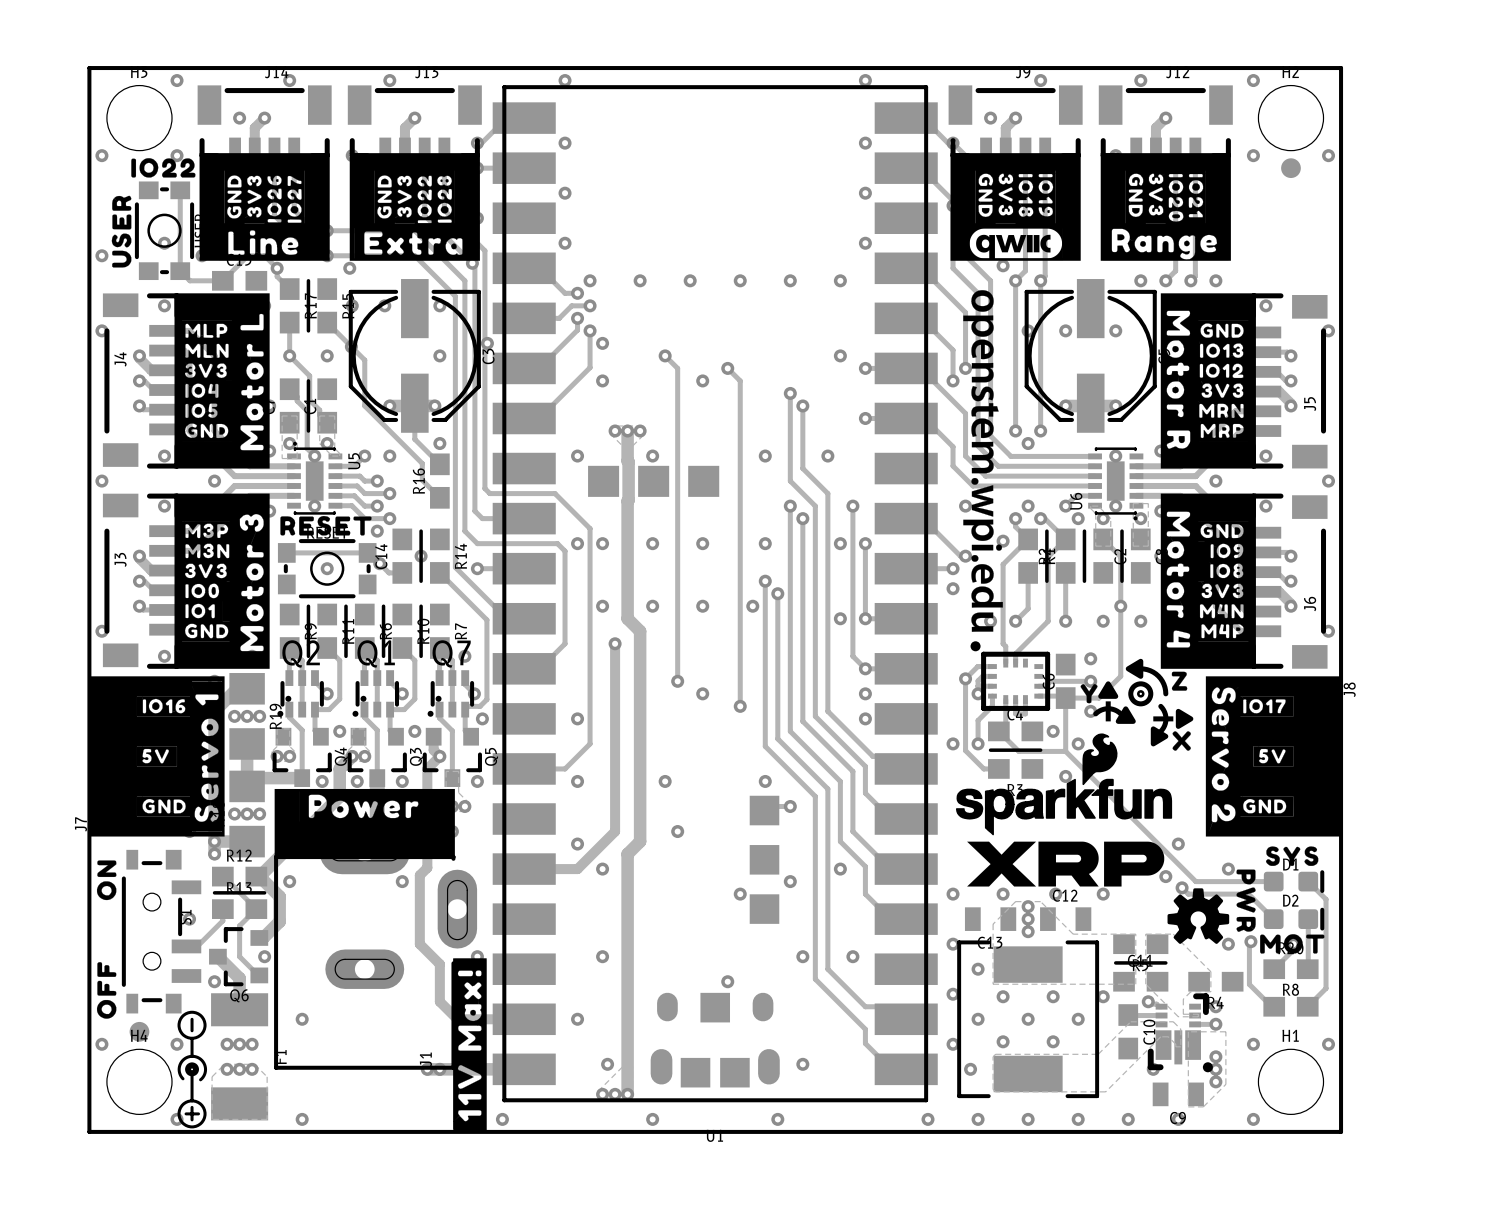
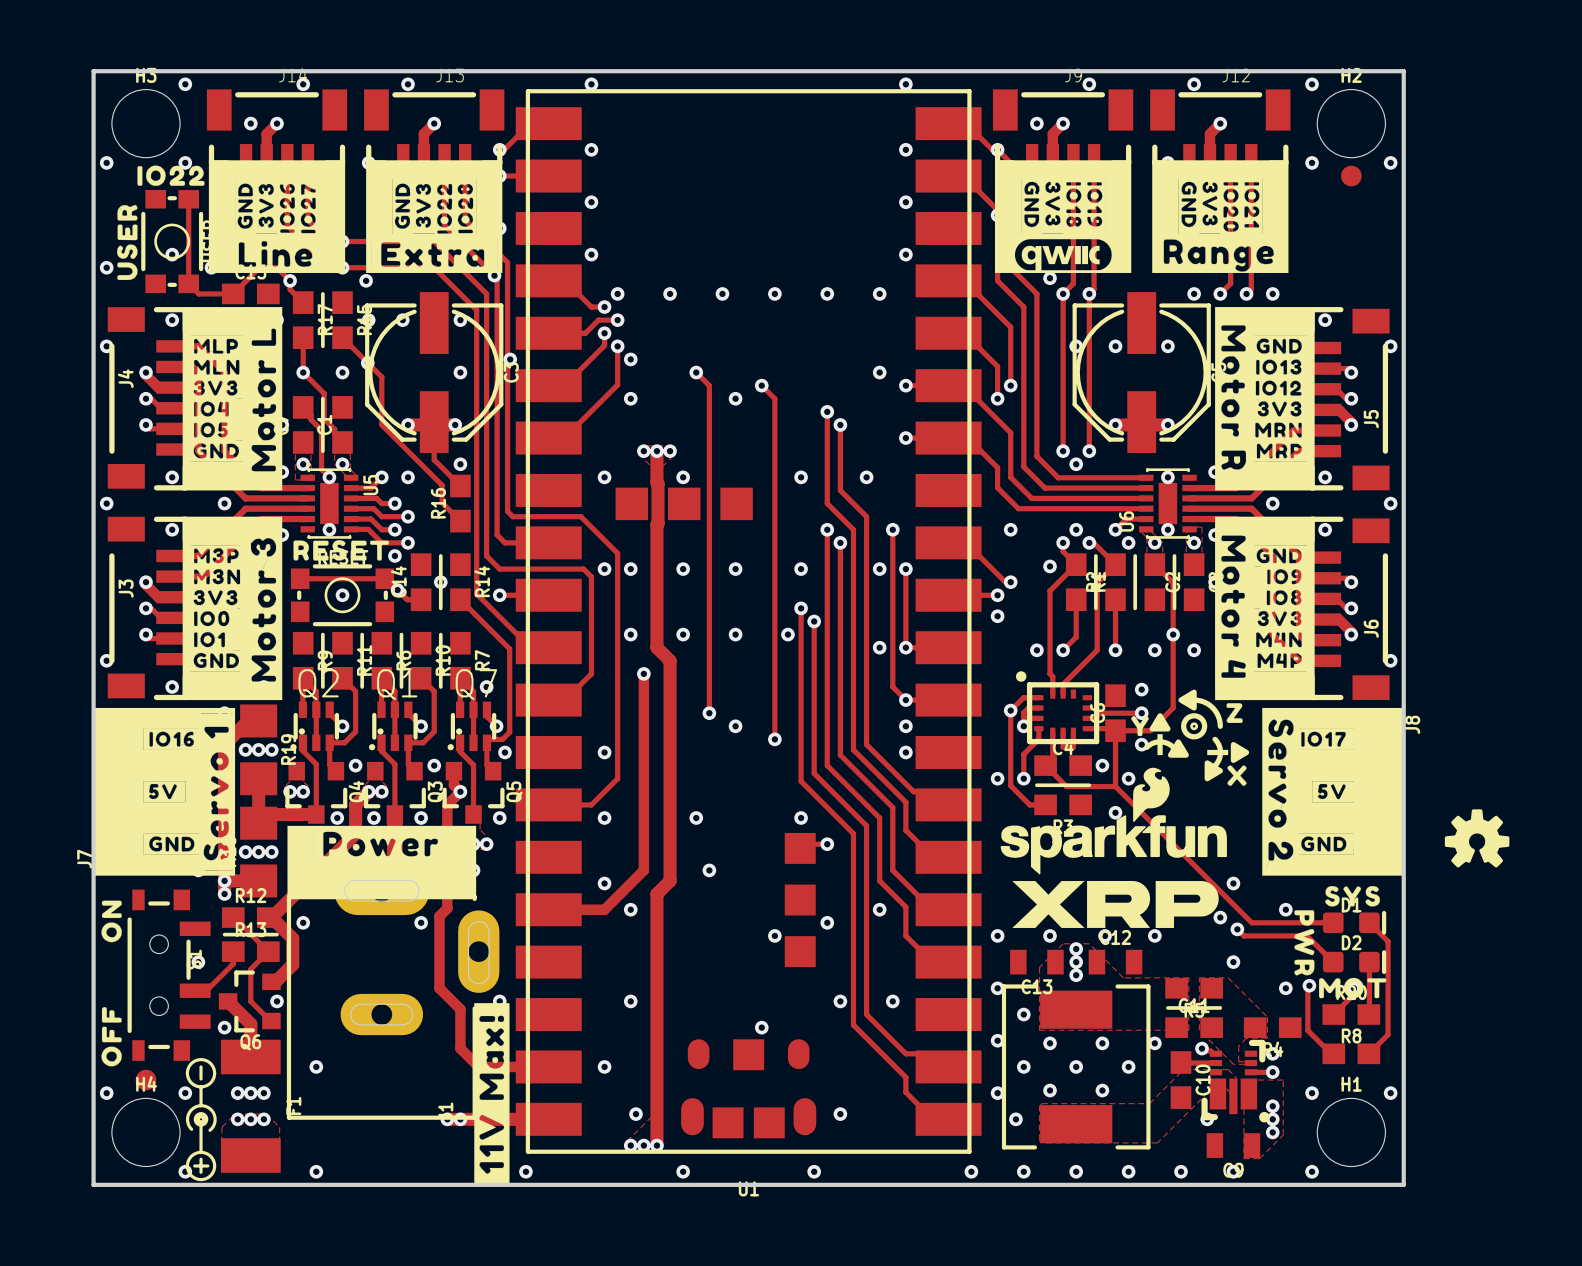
drawing: [963, 290, 1003, 632] -> none
drawing position: (1198, 916) -> (1477, 838)

